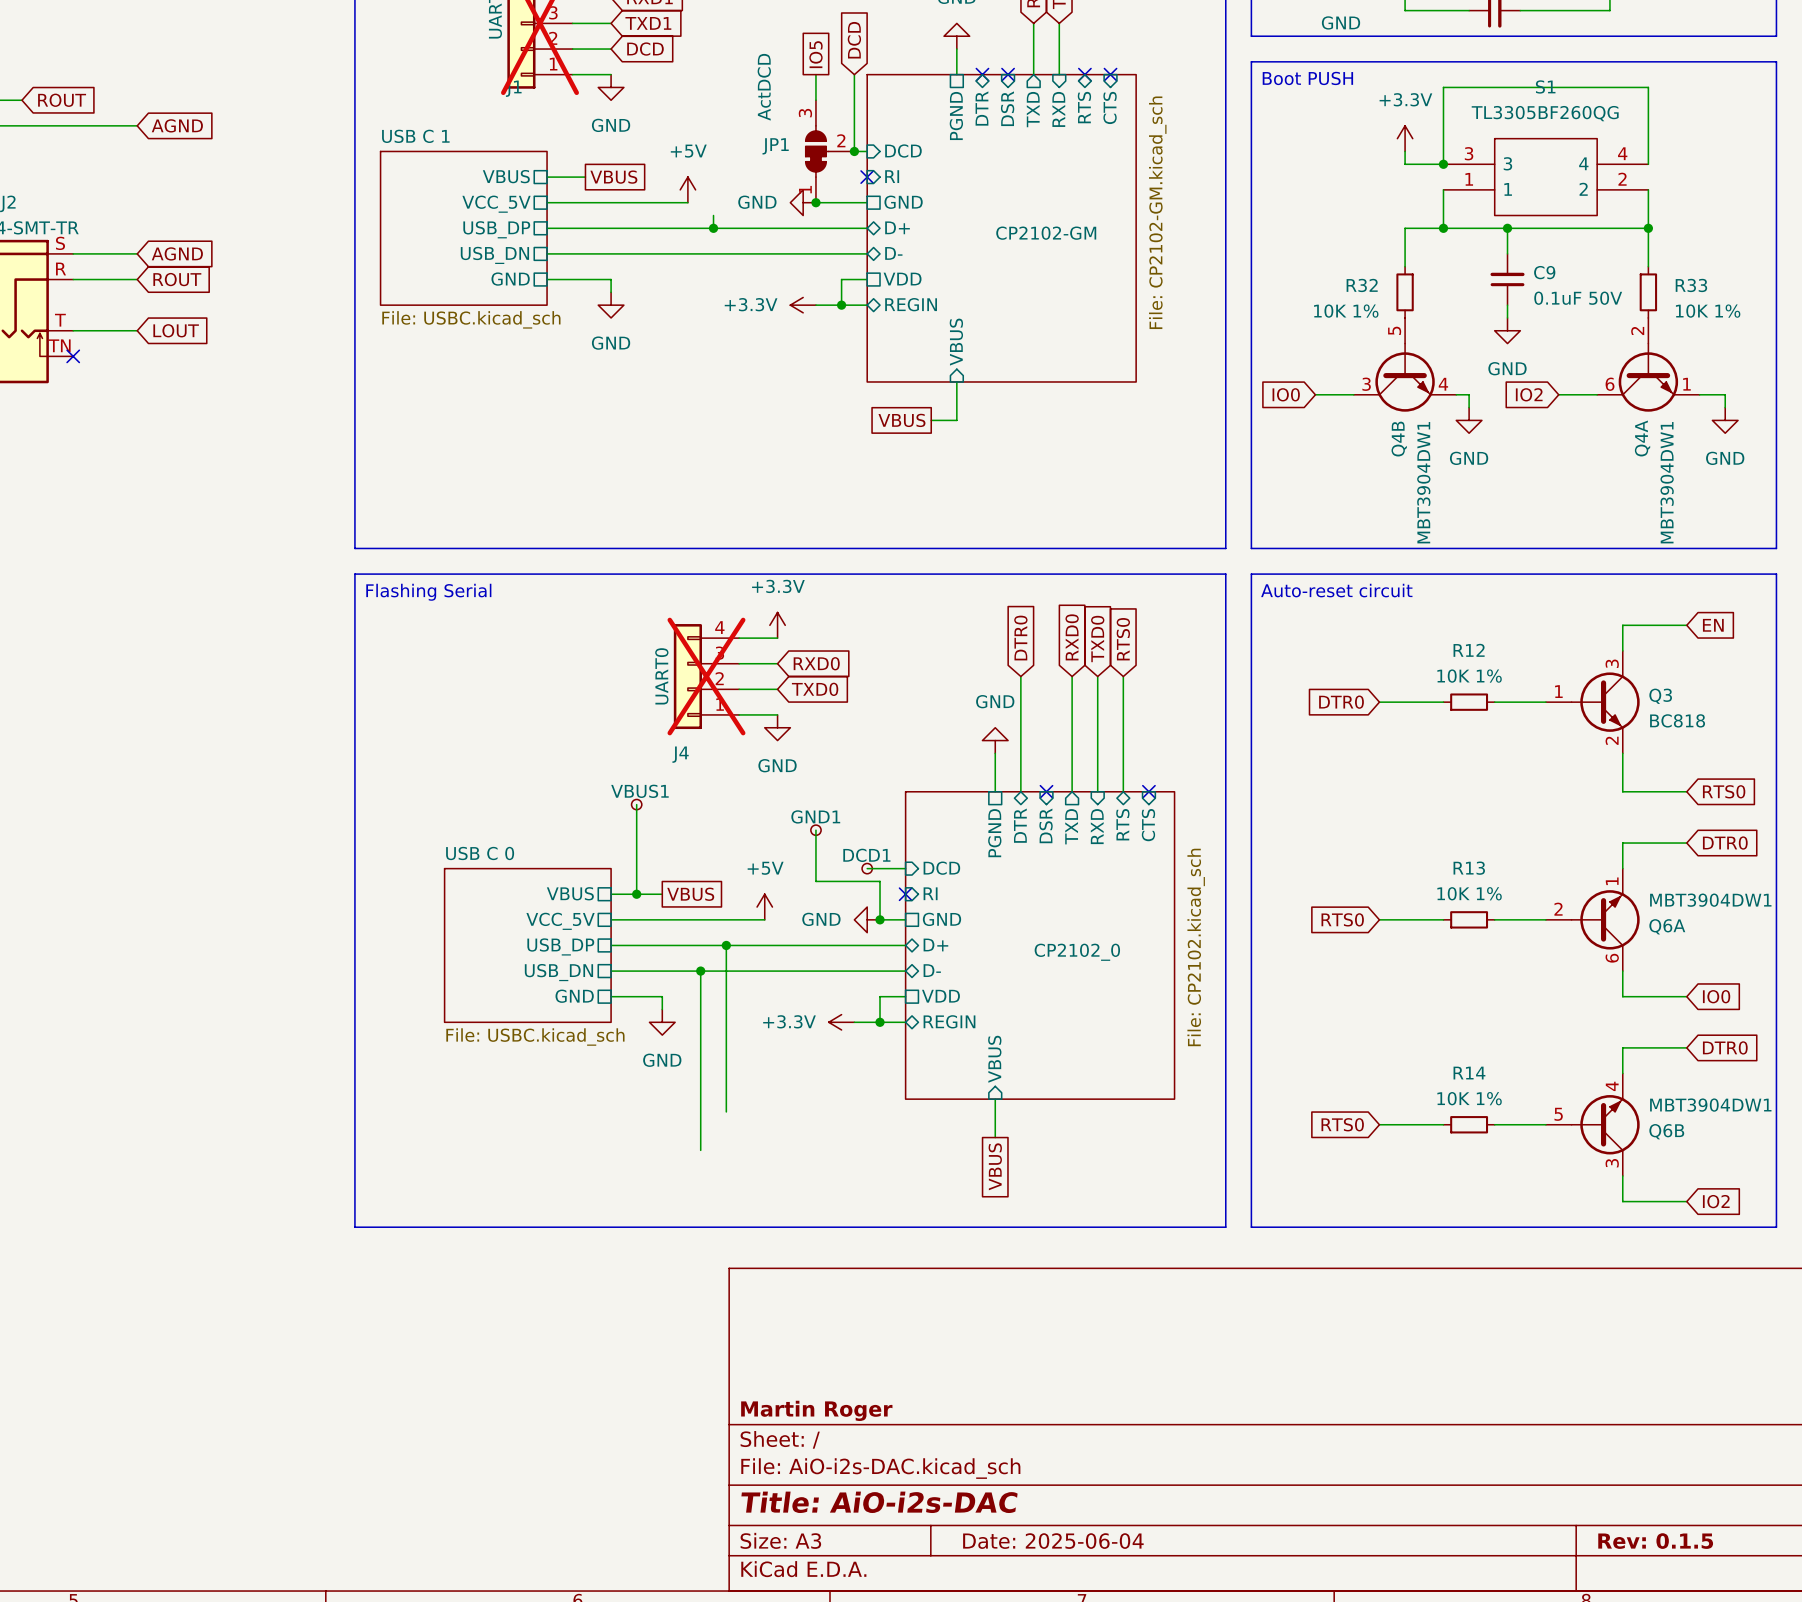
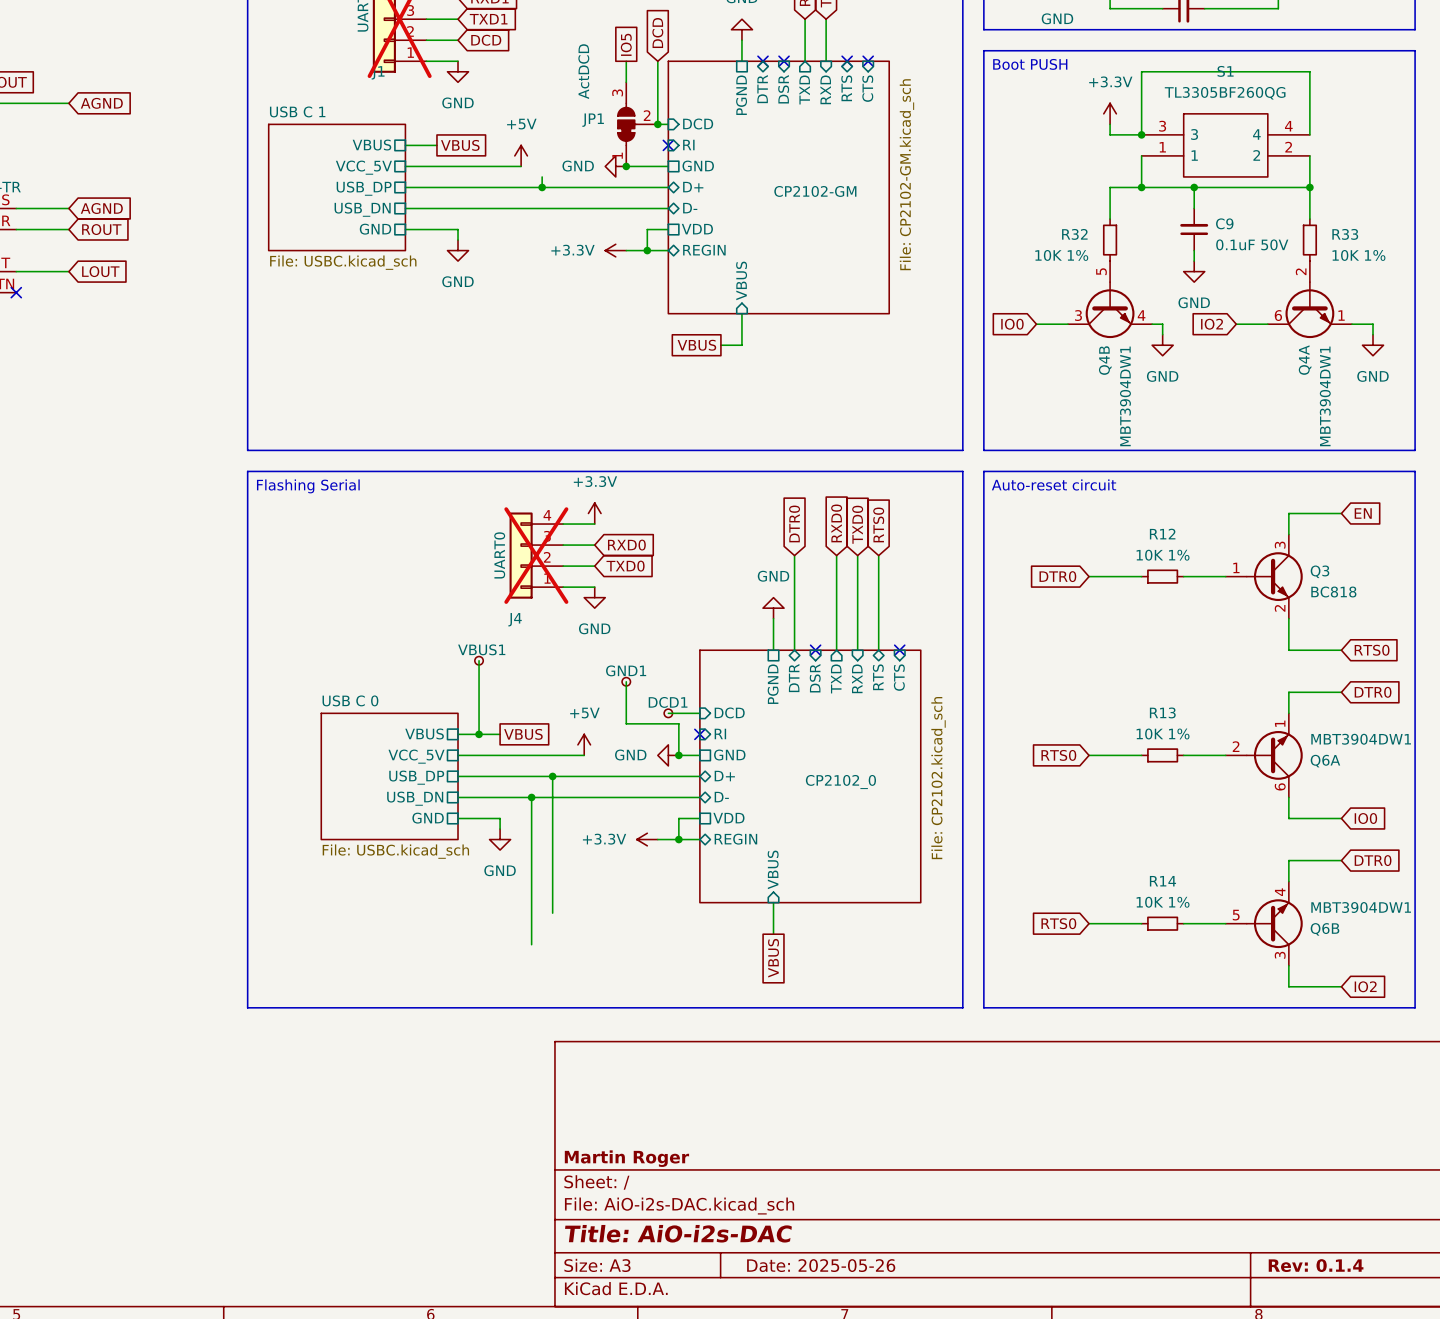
title block: Date: 2025-06-04 (1053, 1541) -> Date: 2025-05-26 (821, 1265)
title block: Rev: 0.1.5 (1655, 1541) -> Rev: 0.1.4 (1316, 1265)

